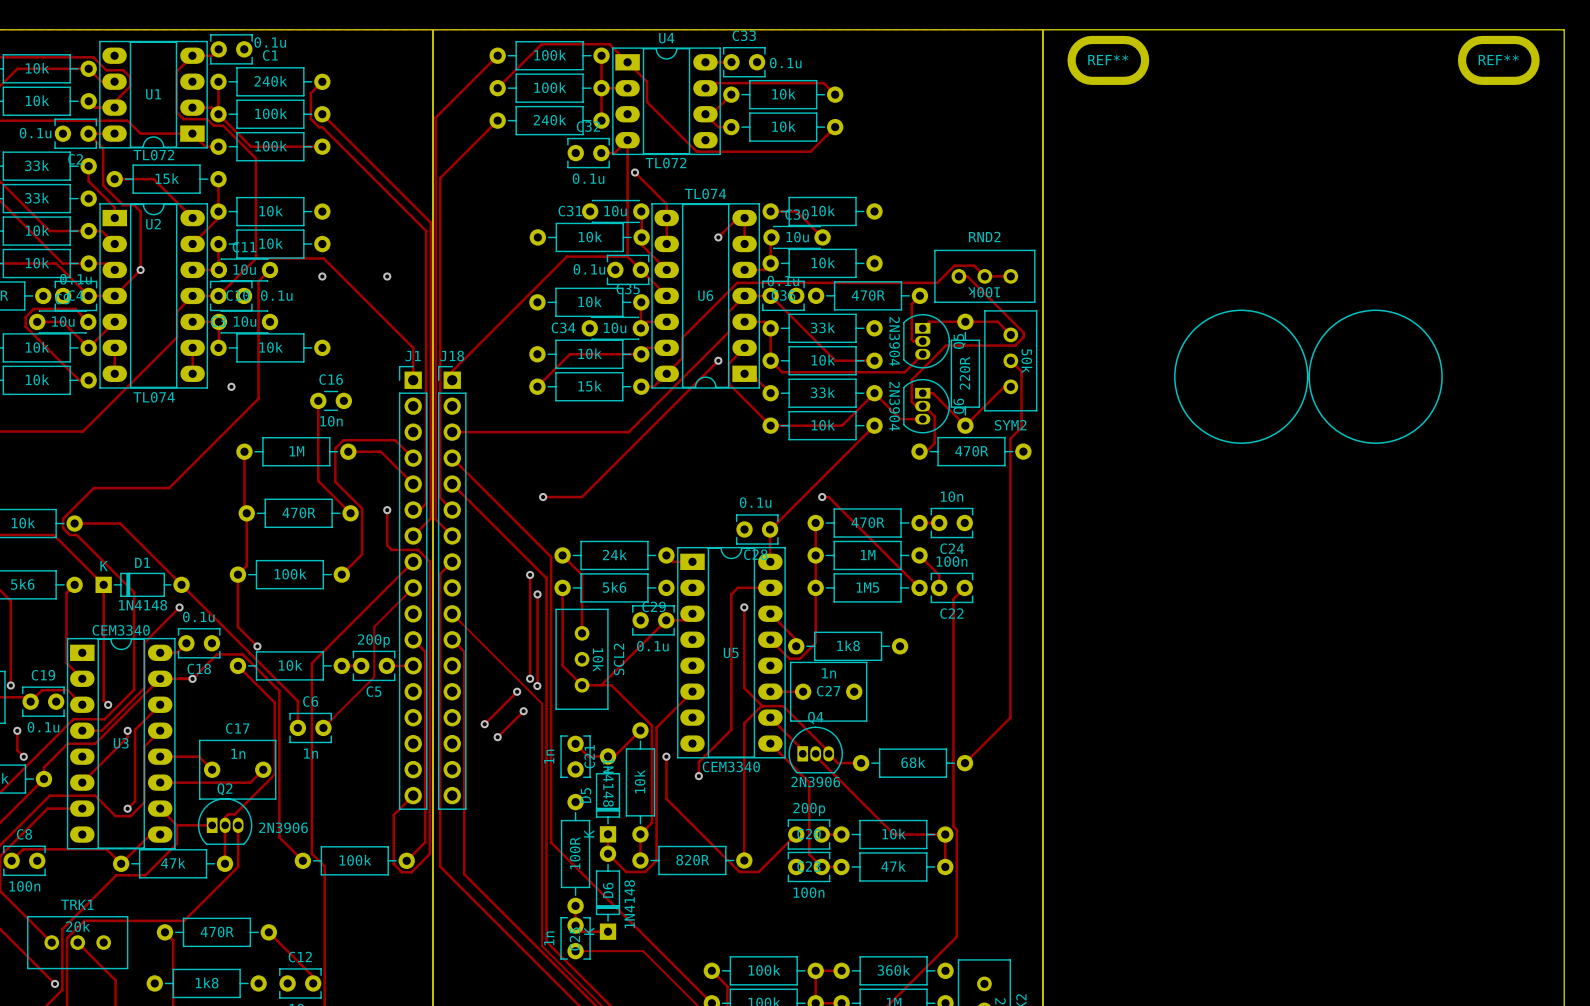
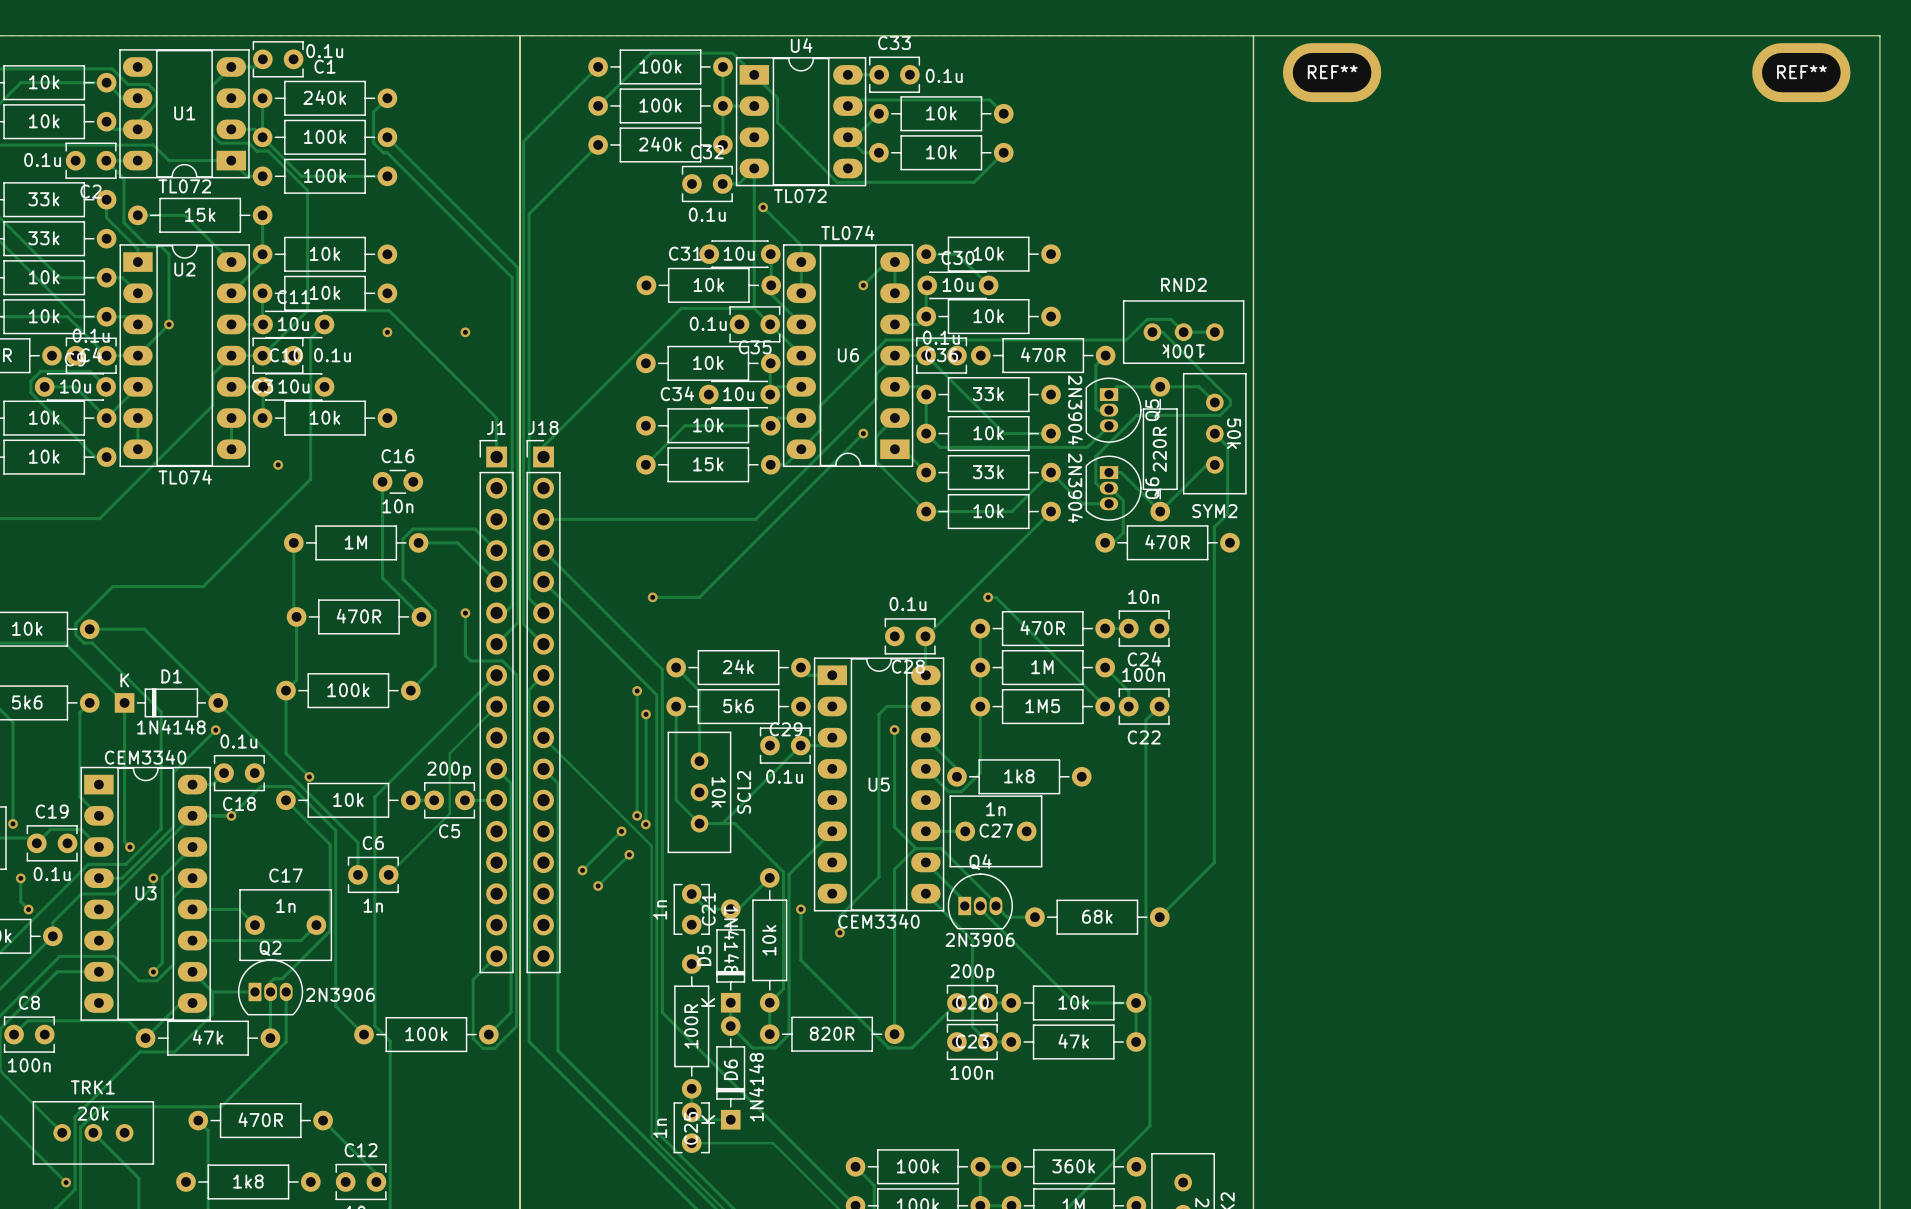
drawing: [1174, 309, 1443, 444] -> none

